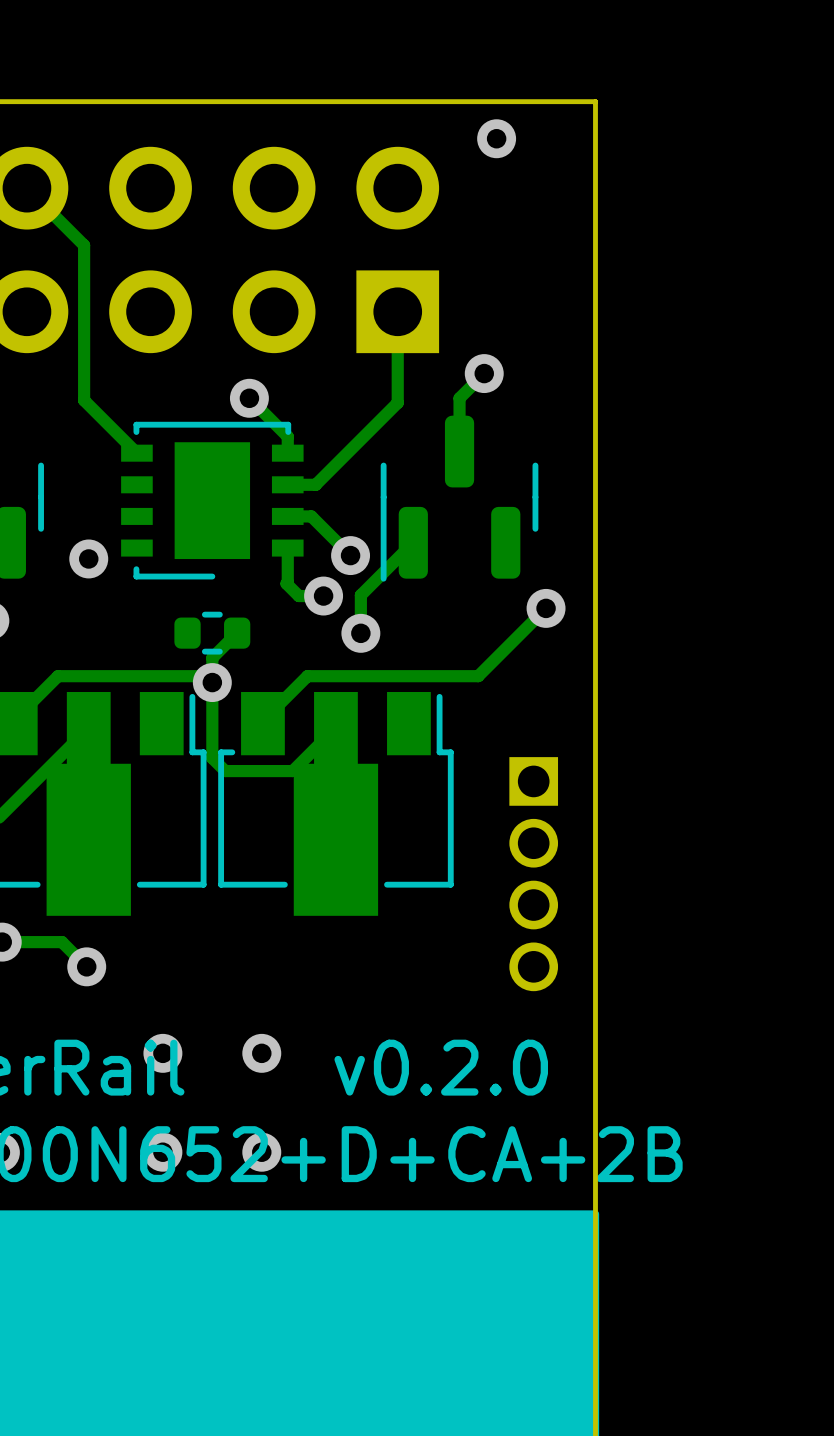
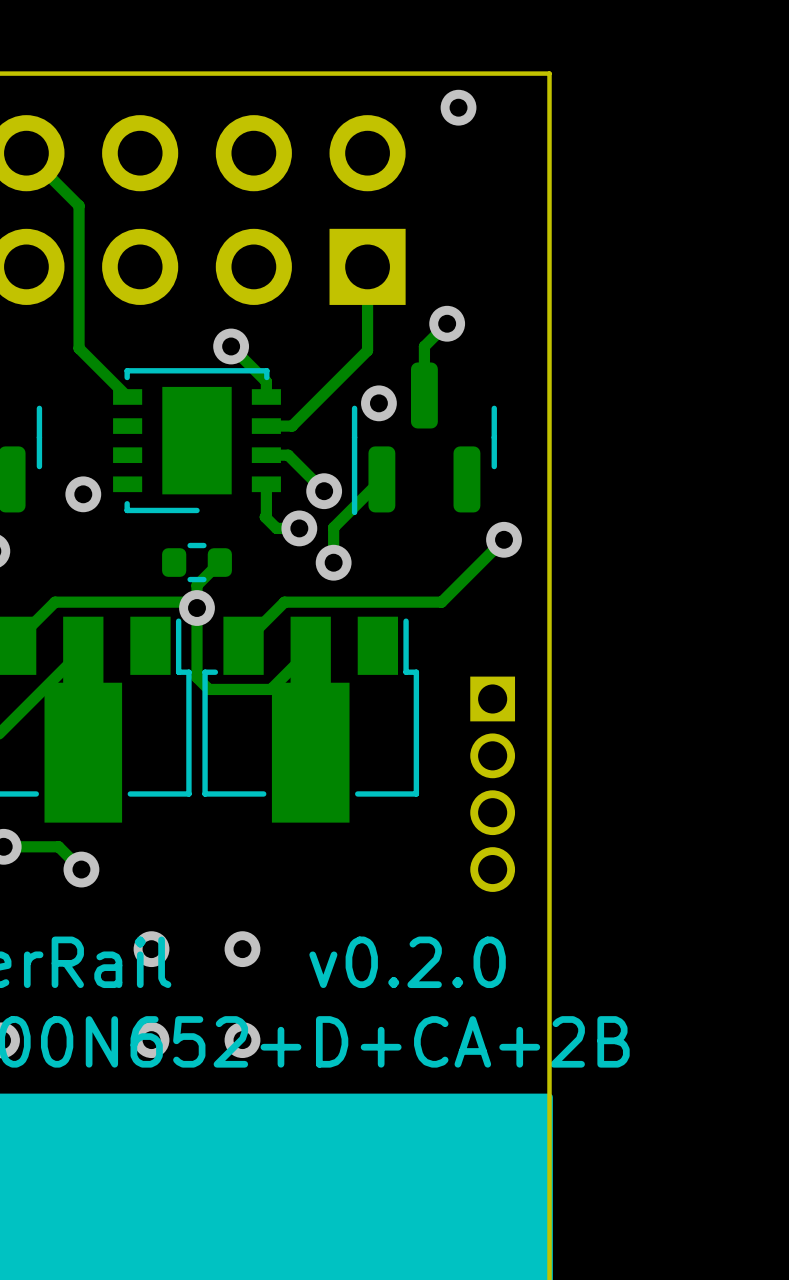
via: none -> (378, 403)

